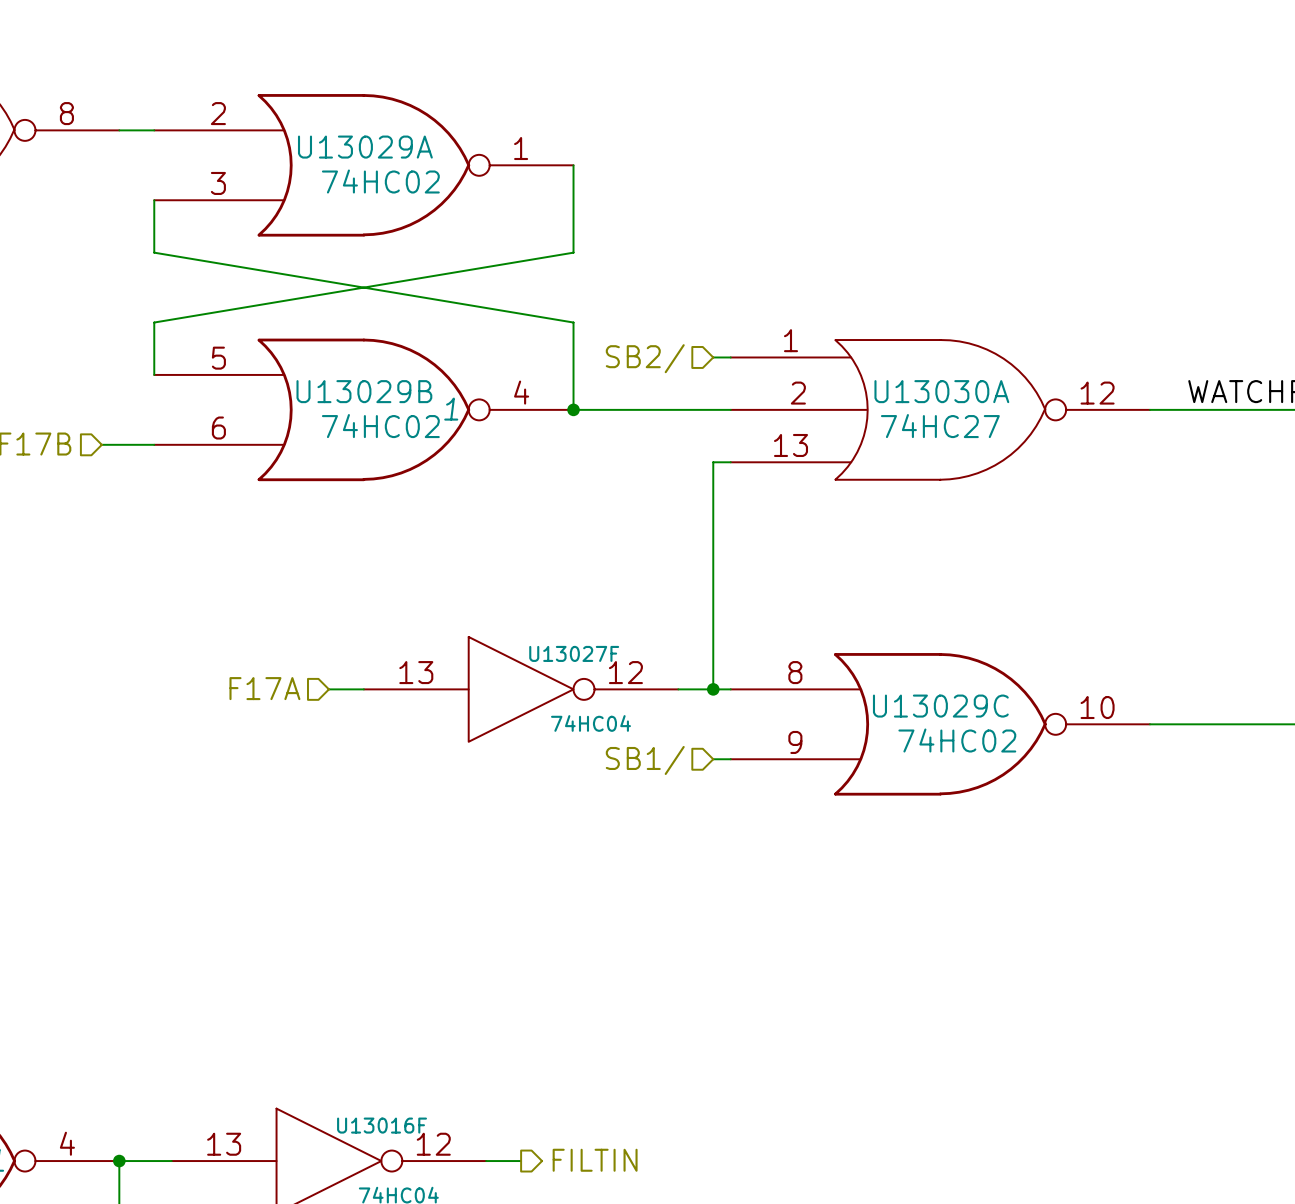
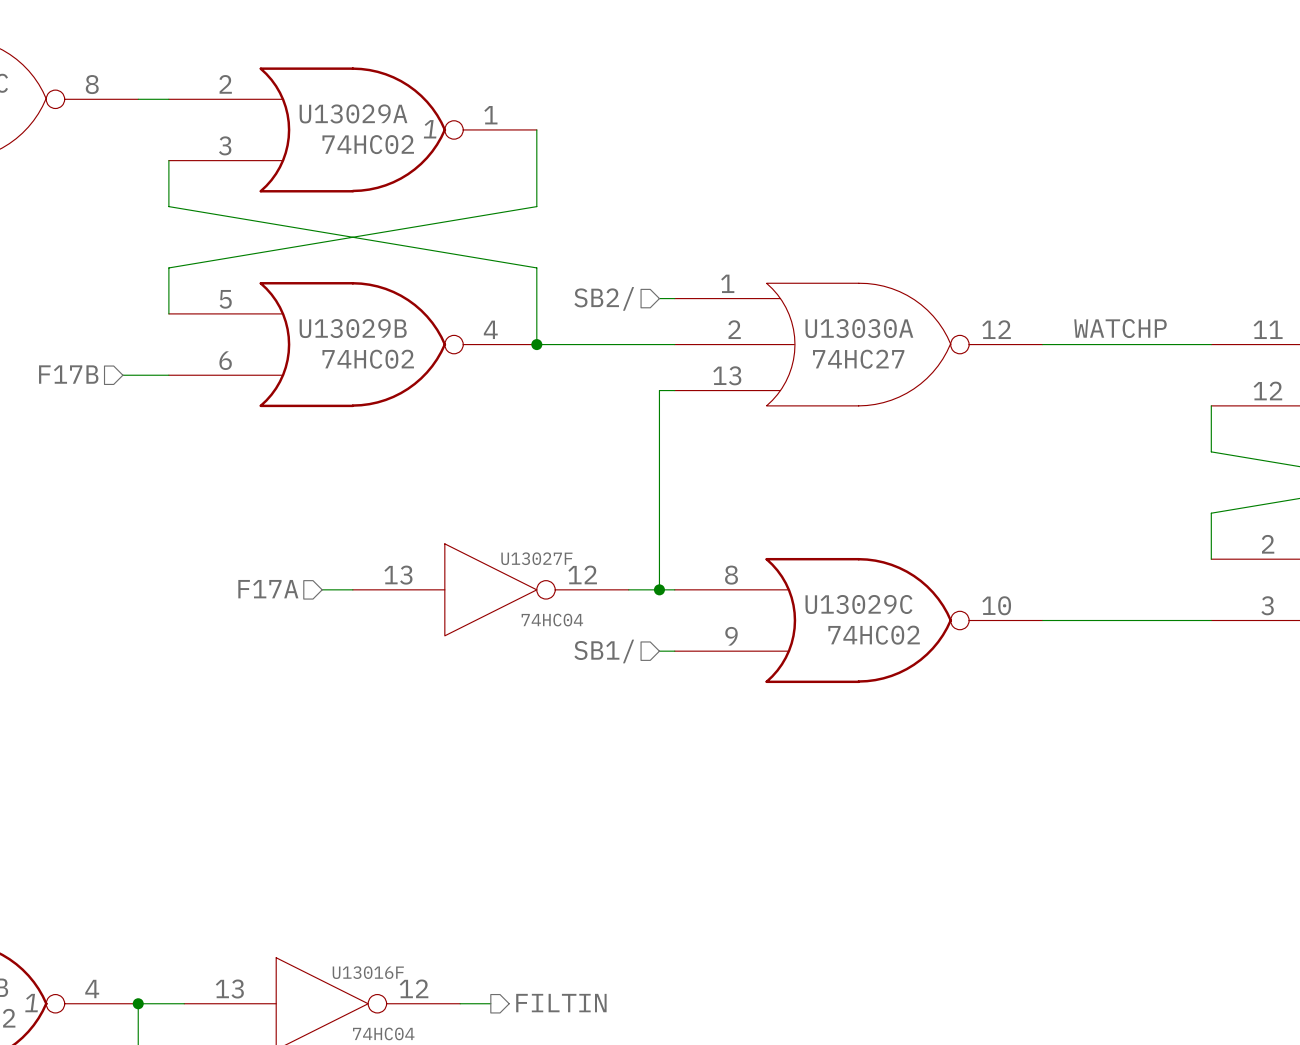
U13029A text: none -> 1 (430, 129)
U13029B text: 1 (451, 409) -> none

